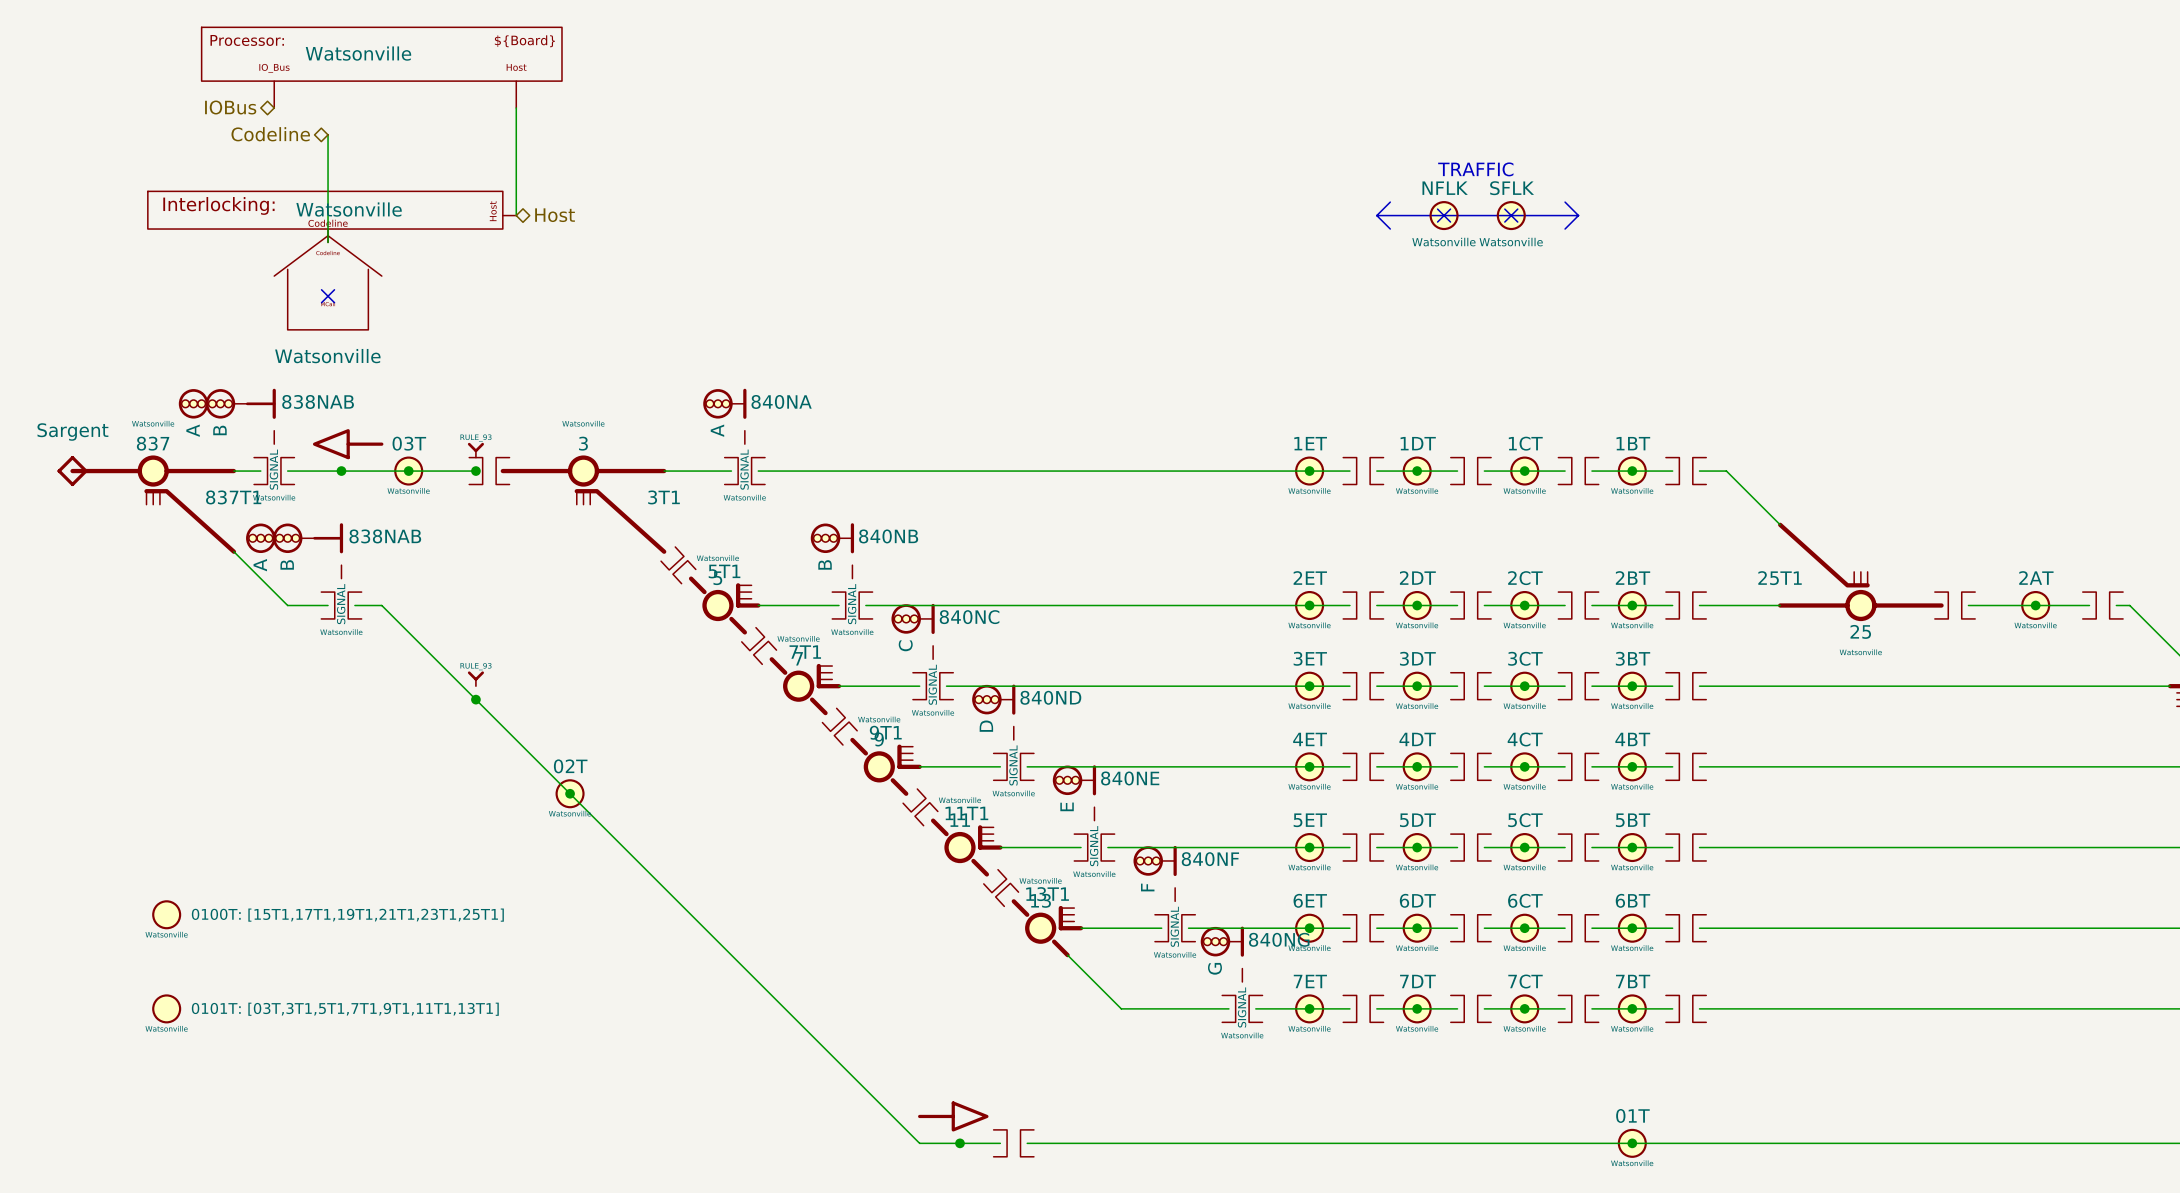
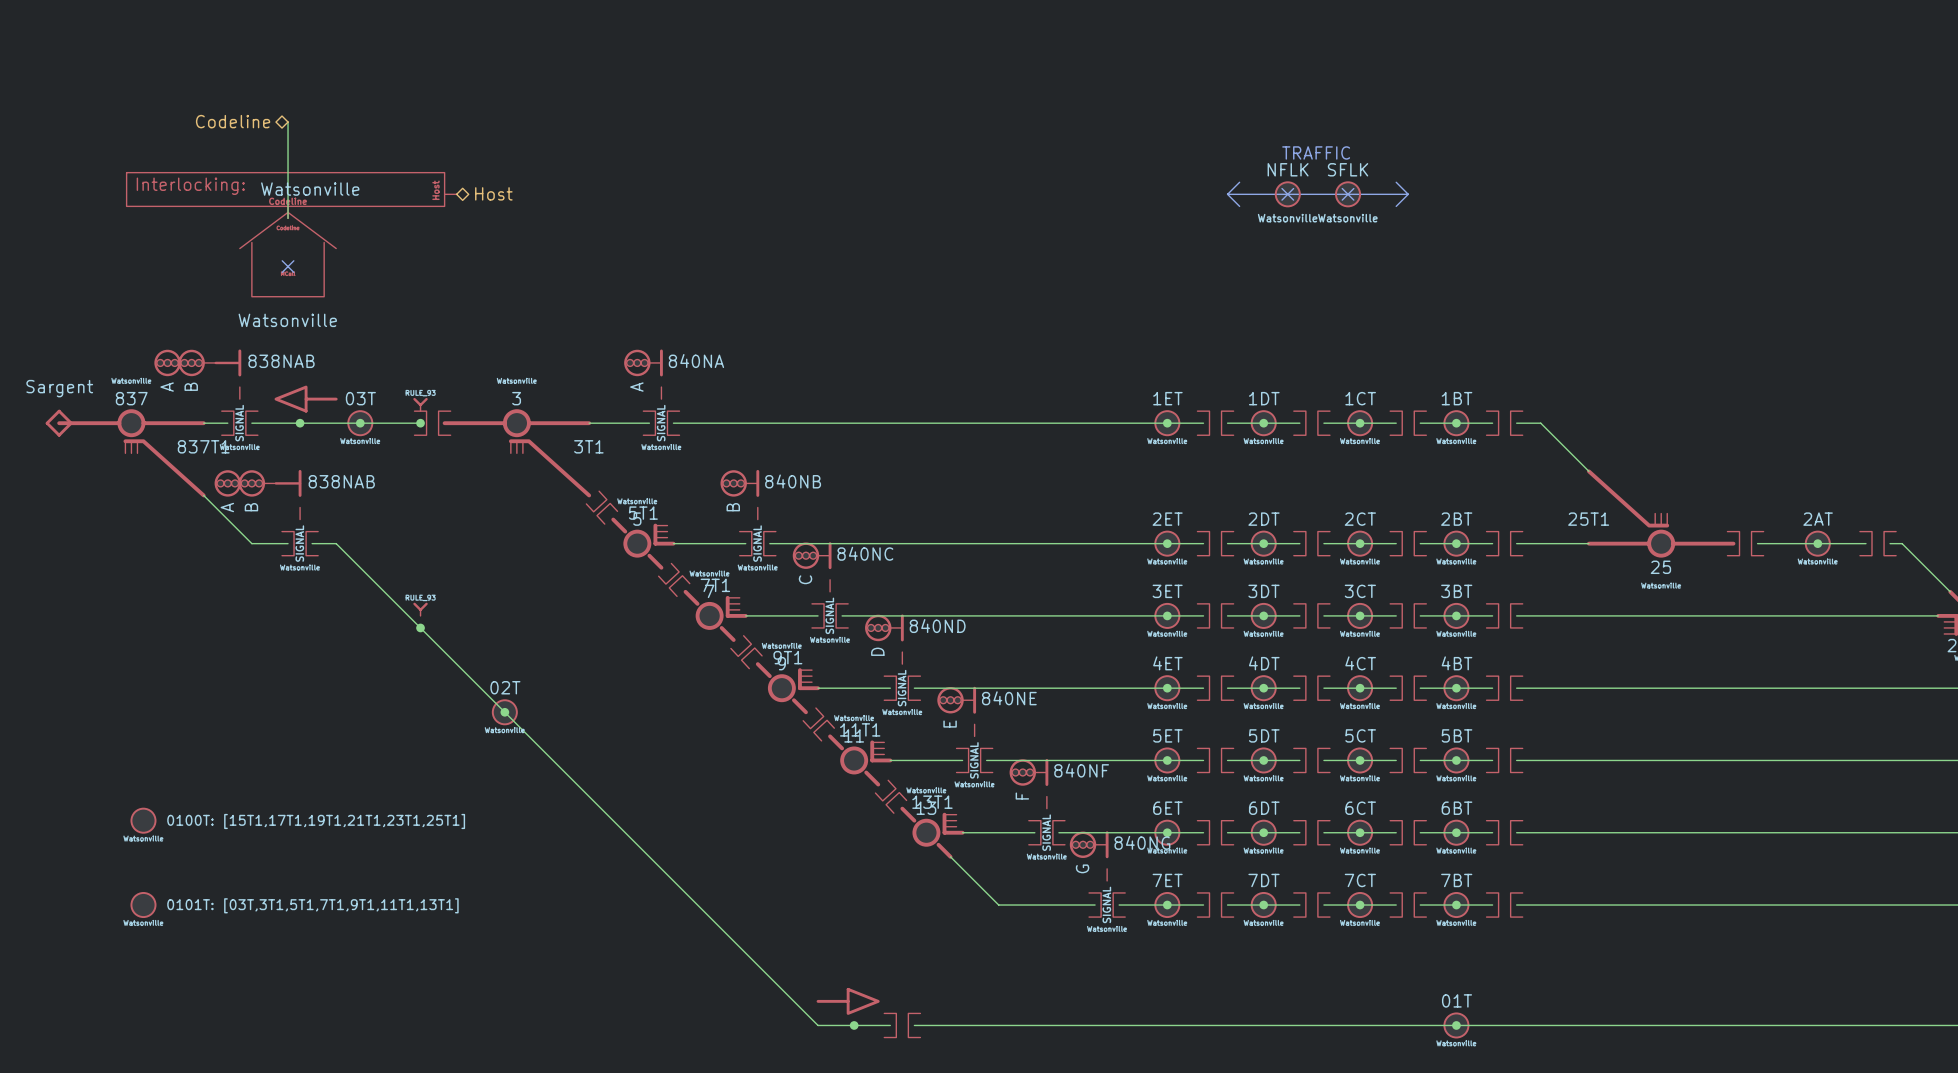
part: Watsonville (381, 67) -> none
hierarchical label: IOBus (230, 107) -> none
wire: (516, 108) (516, 215) -> none

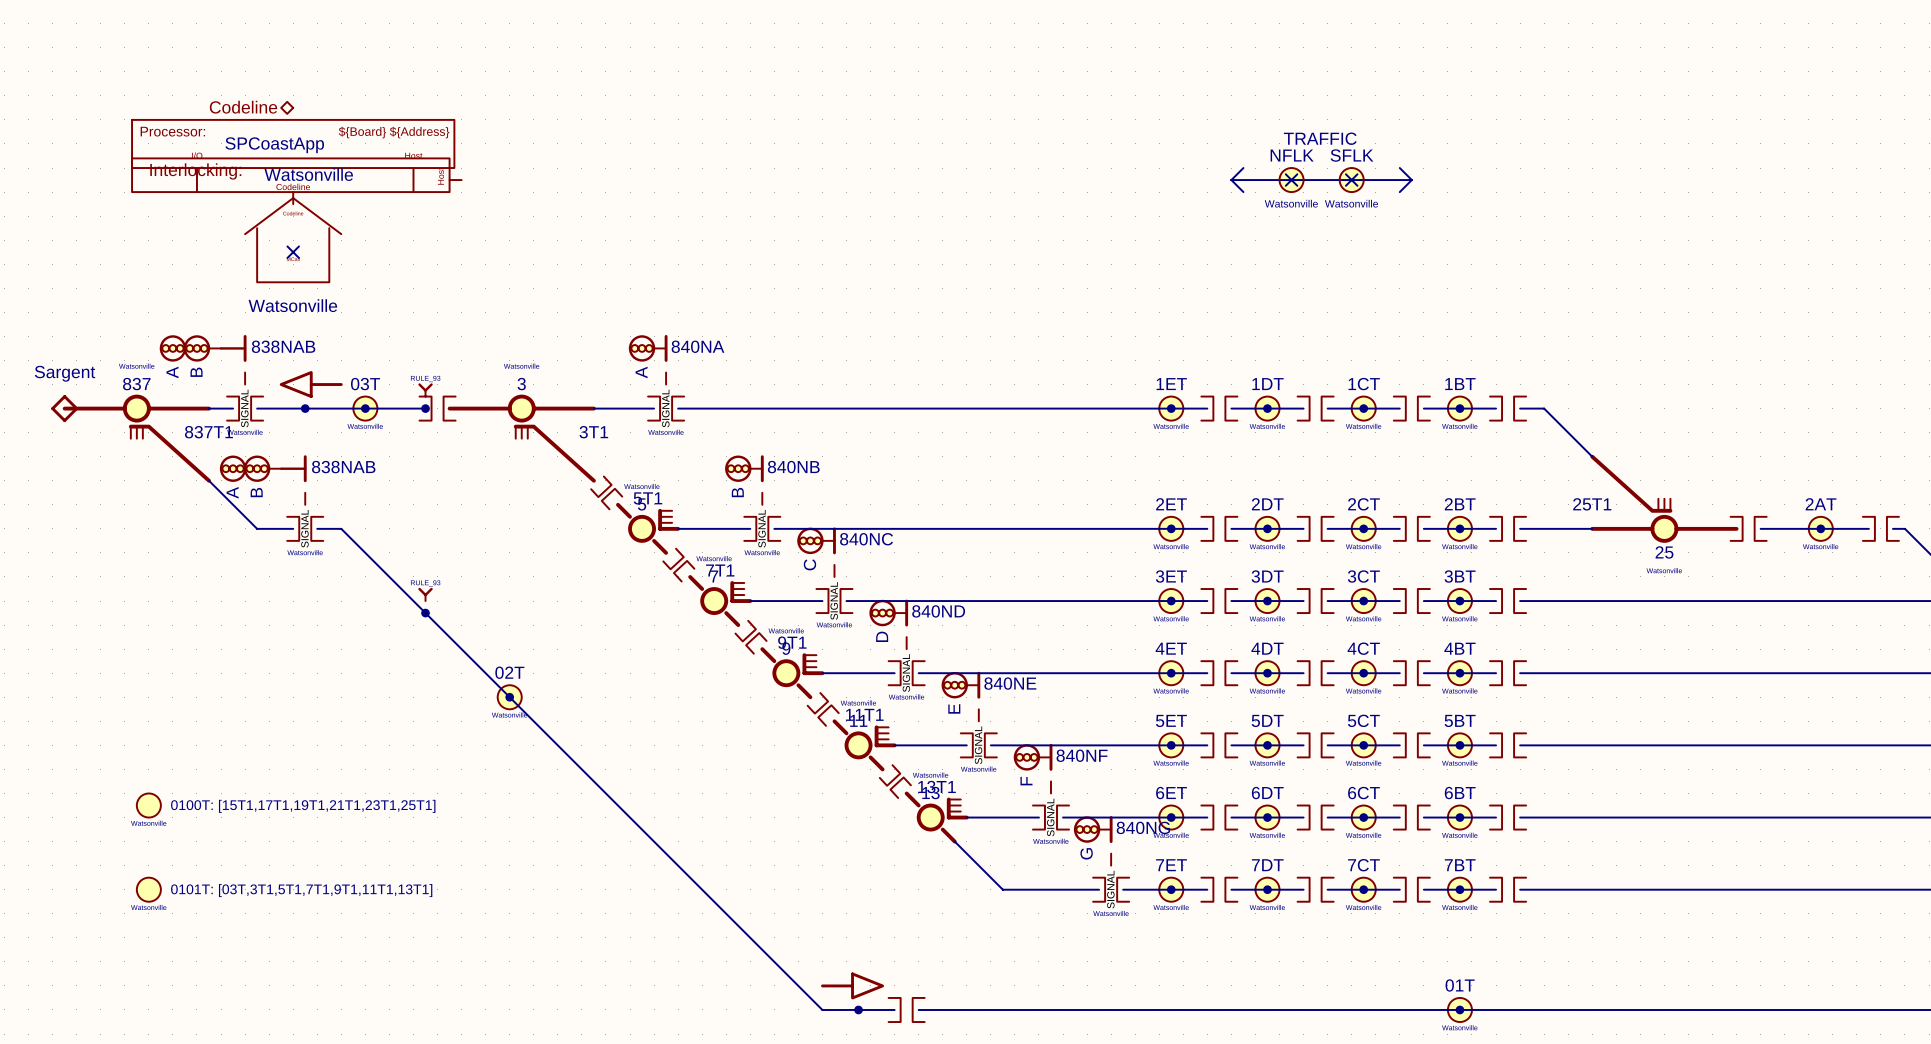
wire: (288, 122) (288, 218) -> none
part: none -> SPCoastApp (293, 155)
hierarchical label: Host (493, 193) -> none

